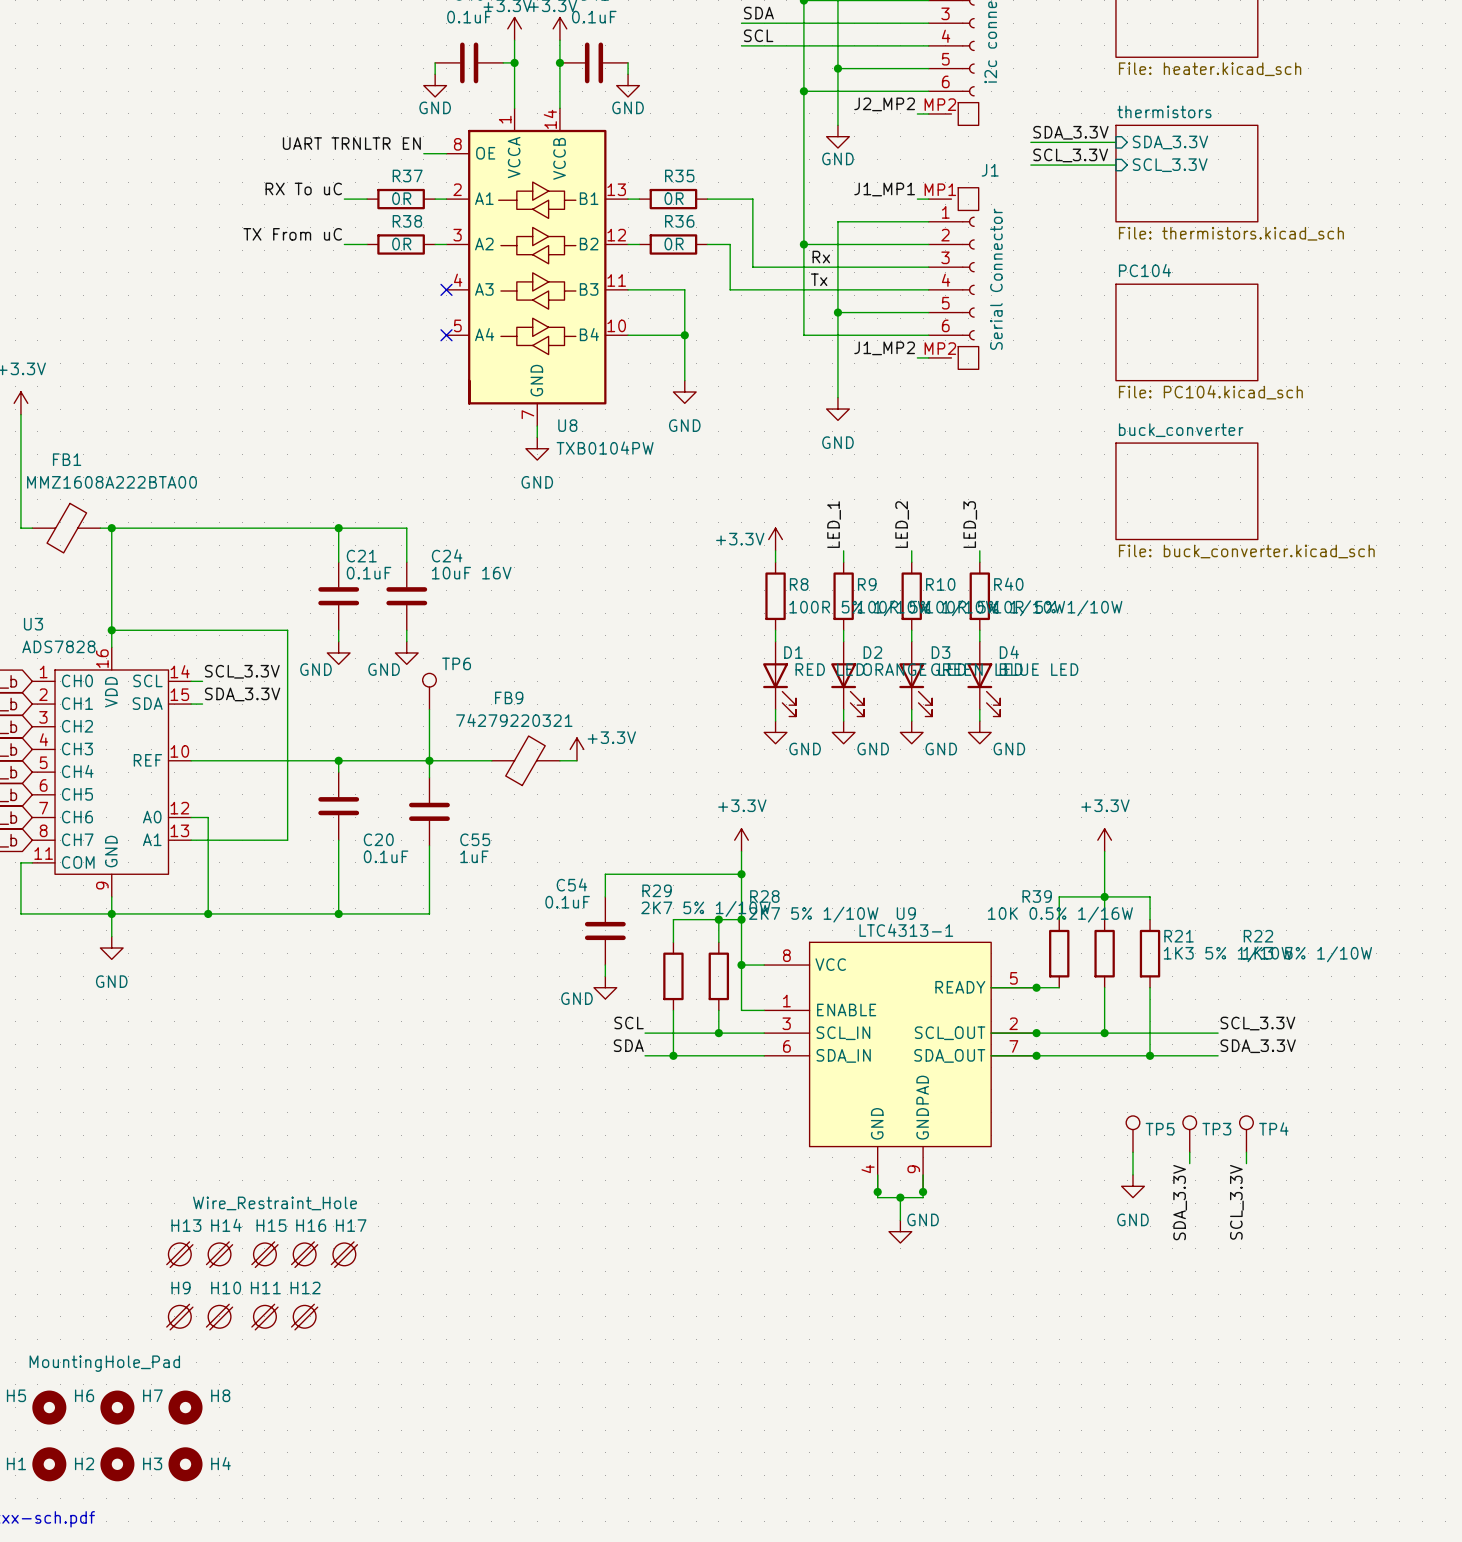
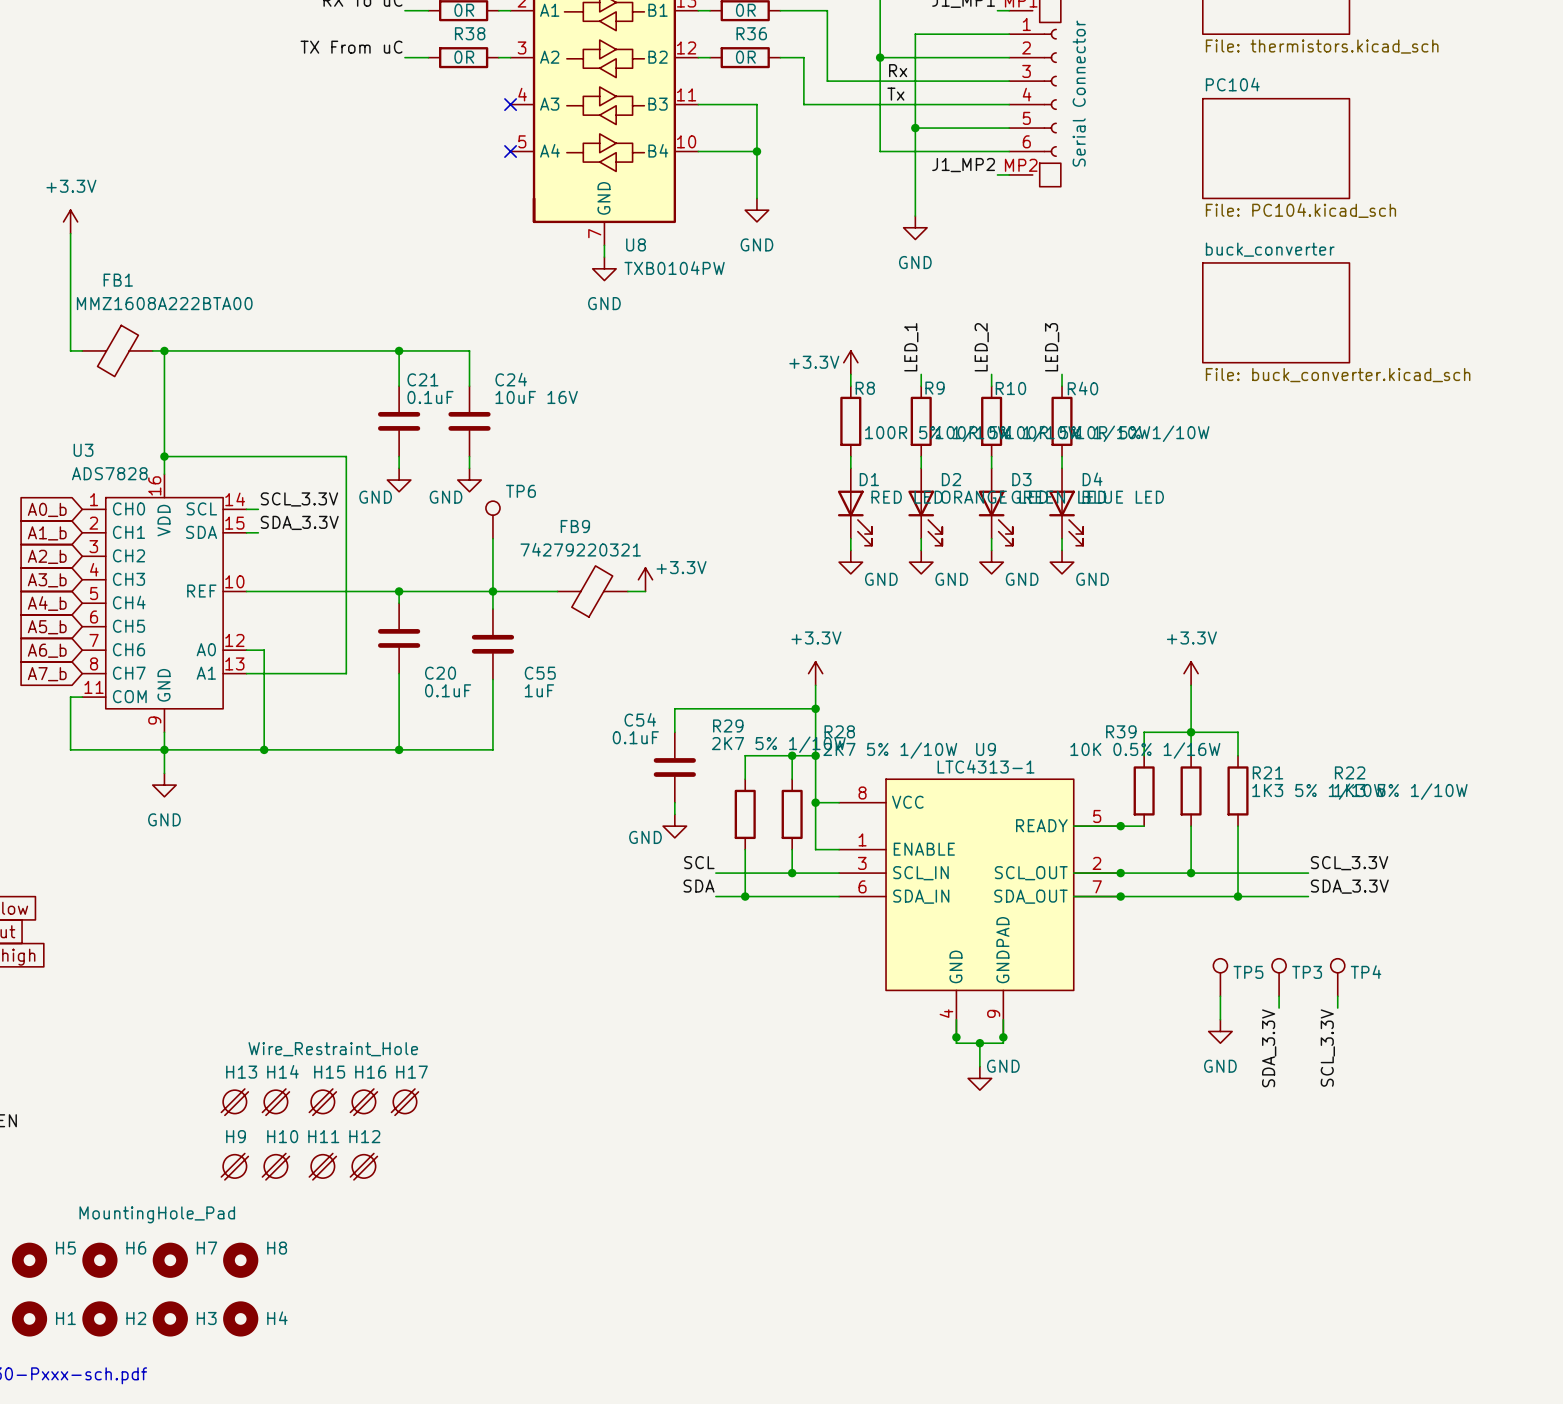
R8 name position: R8 (799, 584) -> R8 (865, 388)
R9 name position: R9 (867, 584) -> R9 (935, 388)
R10 name position: R10 (940, 584) -> R10 (1010, 388)
R40 name position: R40 (1008, 584) -> R40 (1082, 388)

